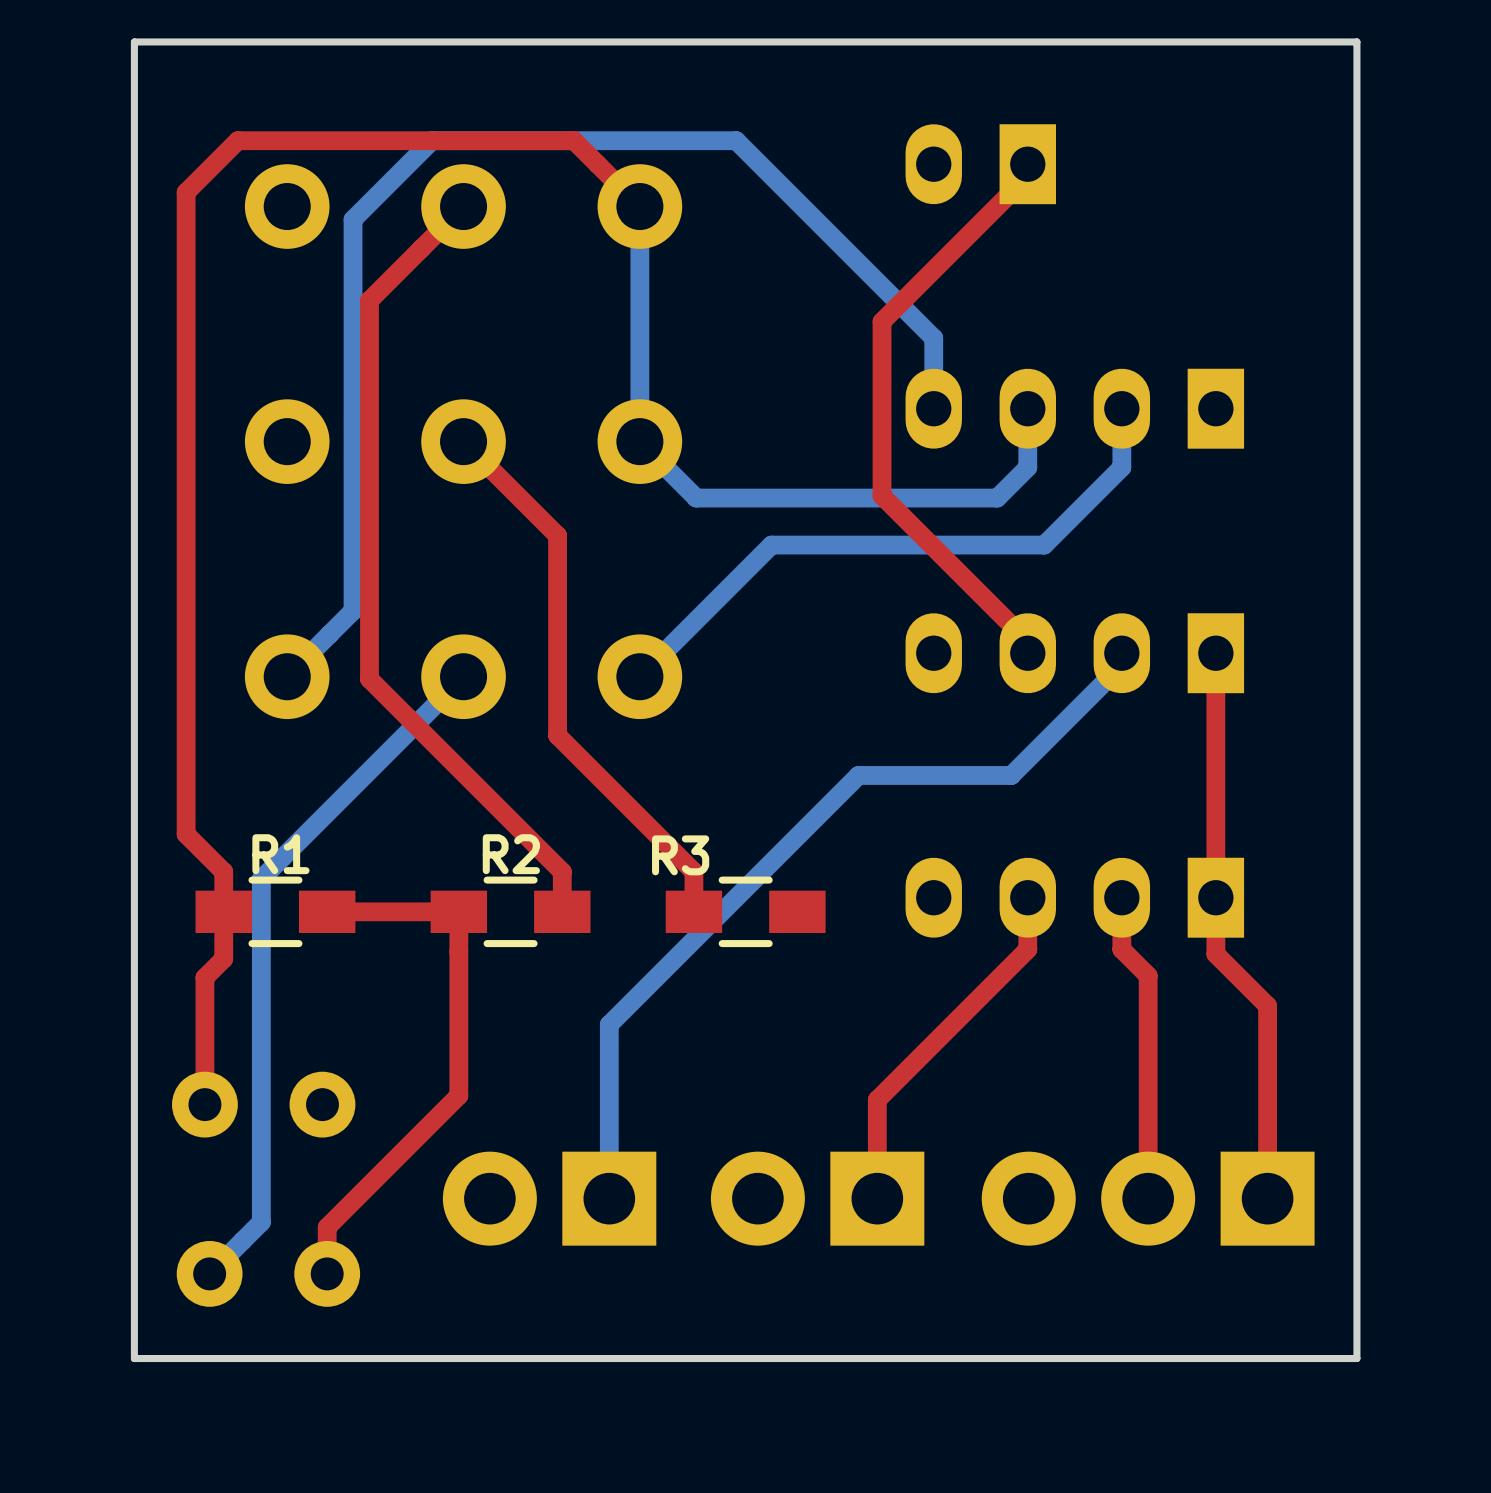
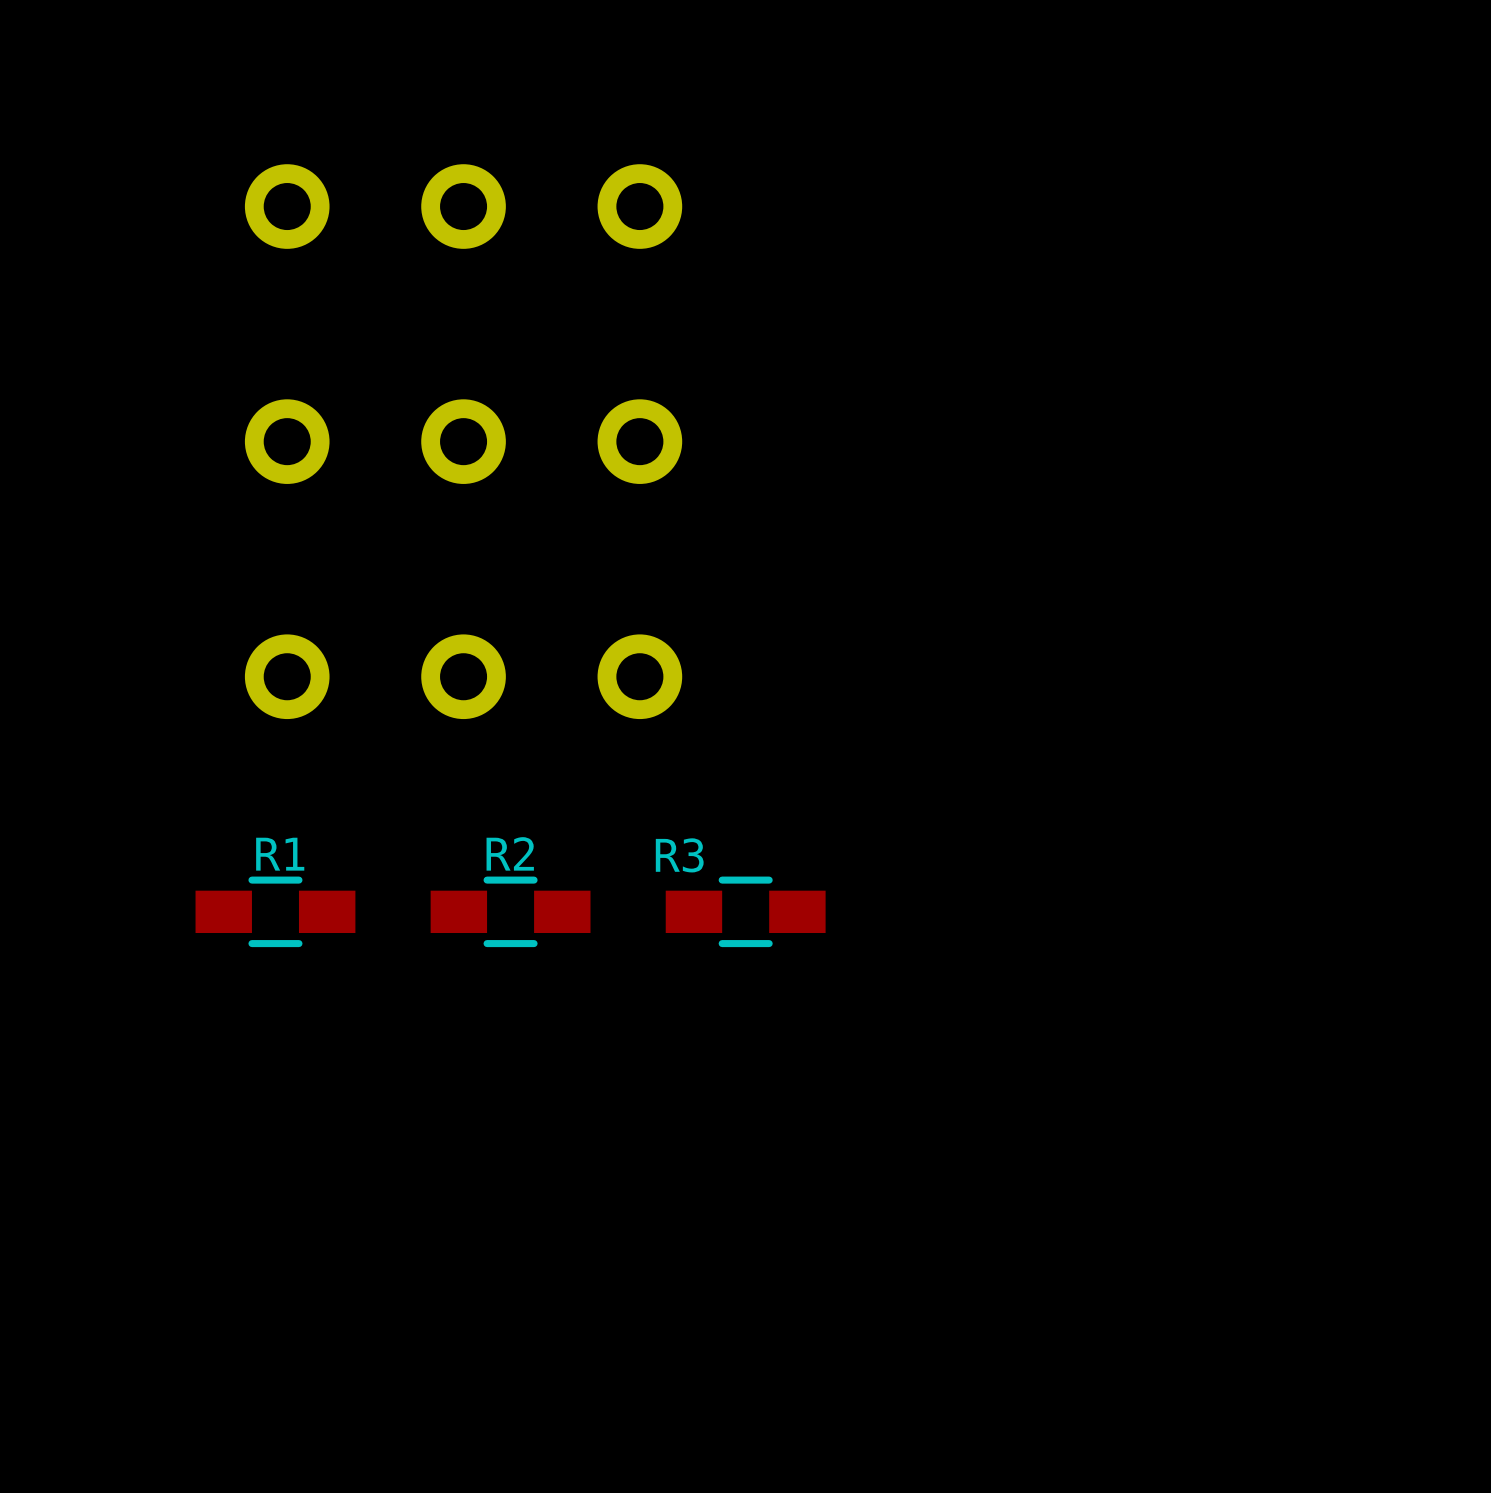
board edge: (134, 41) (134, 1358) (1356, 1358) (1356, 41) (134, 41) -> none
part: (980, 164) -> none
top track: (1027, 164) (1027, 175) (882, 321) (882, 495) (1027, 641) (1027, 653) -> none
top track: (463, 206) (369, 300) (369, 679) (562, 871) (562, 911) -> none
bottom track: (639, 206) (639, 441) (696, 498) (997, 498) (1027, 467) (1027, 408) -> none
top track: (639, 206) (574, 140) (237, 140) (186, 192) (186, 834) (223, 871) (223, 958) (204, 977) (204, 1104) -> none
bottom track: (933, 408) (933, 338) (736, 140) (431, 140) (353, 219) (353, 610) (287, 676) -> none
part: (1074, 408) -> none
bottom track: (1121, 408) (1121, 467) (1044, 545) (771, 545) (639, 676) -> none
top track: (463, 441) (557, 535) (557, 735) (693, 871) (693, 911) -> none
part: (1074, 653) -> none
bottom track: (1121, 653) (1121, 664) (1011, 775) (858, 775) (609, 1024) (609, 1198) -> none
top track: (1215, 653) (1215, 954) (1267, 1005) (1267, 1198) -> none
bottom track: (463, 676) (261, 878) (261, 1222) (209, 1273) -> none
top track: (1027, 897) (1027, 949) (877, 1099) (877, 1198) -> none
part: (1074, 897) -> none
top track: (1121, 897) (1121, 949) (1148, 975) (1148, 1198) -> none
top track: (327, 911) (458, 911) (458, 1095) (327, 1227) (327, 1273) -> none
part: (263, 1104) -> none
part: (549, 1198) -> none
part: (817, 1198) -> none
part: (1148, 1198) -> none
part: (268, 1273) -> none

